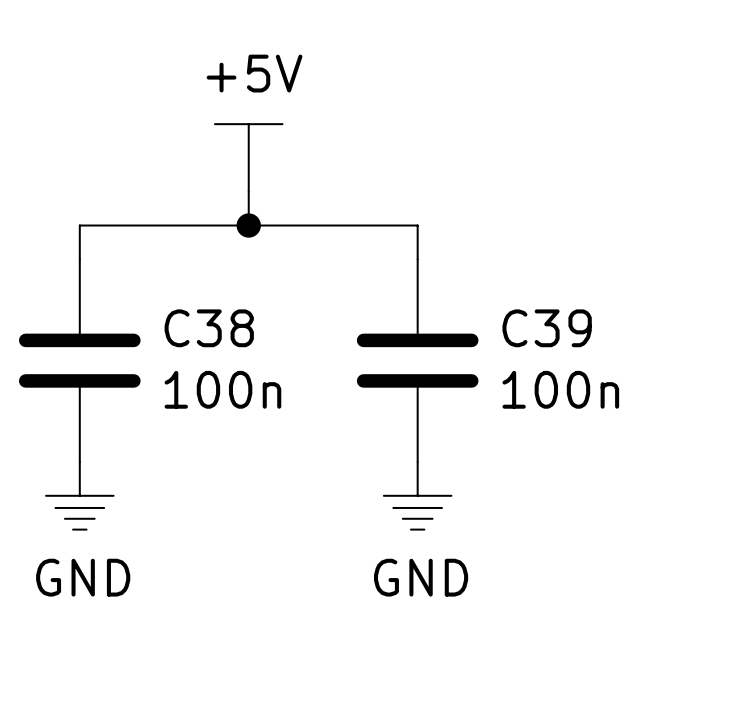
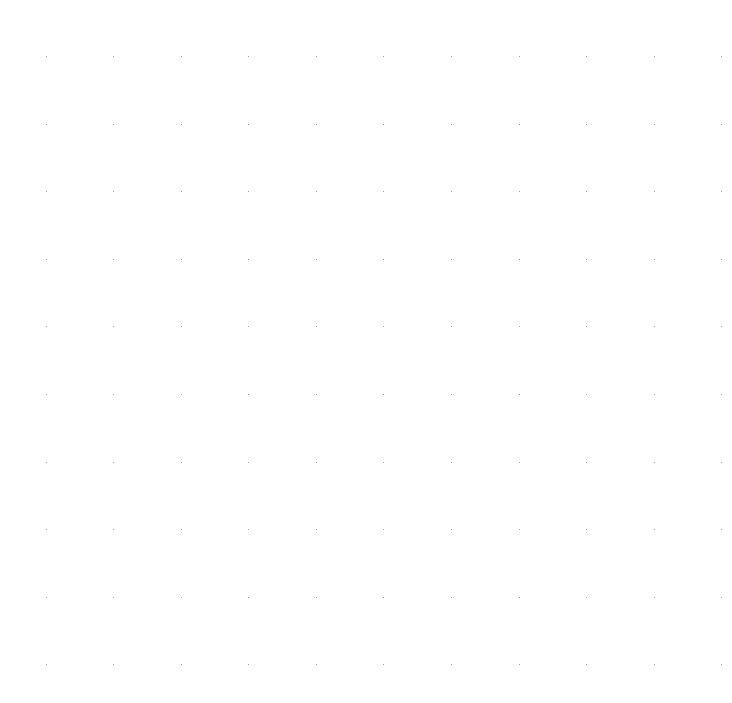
power symbol: +5V (248, 157) -> none
wire: (248, 191) (248, 225) -> none
junction: (248, 225) -> none
wire: (79, 259) (79, 225) (417, 225) (417, 259) -> none
C38: 100n (79, 360) -> none
C39: 100n (417, 360) -> none
power symbol: GND (79, 495) -> none
power symbol: GND (417, 495) -> none

